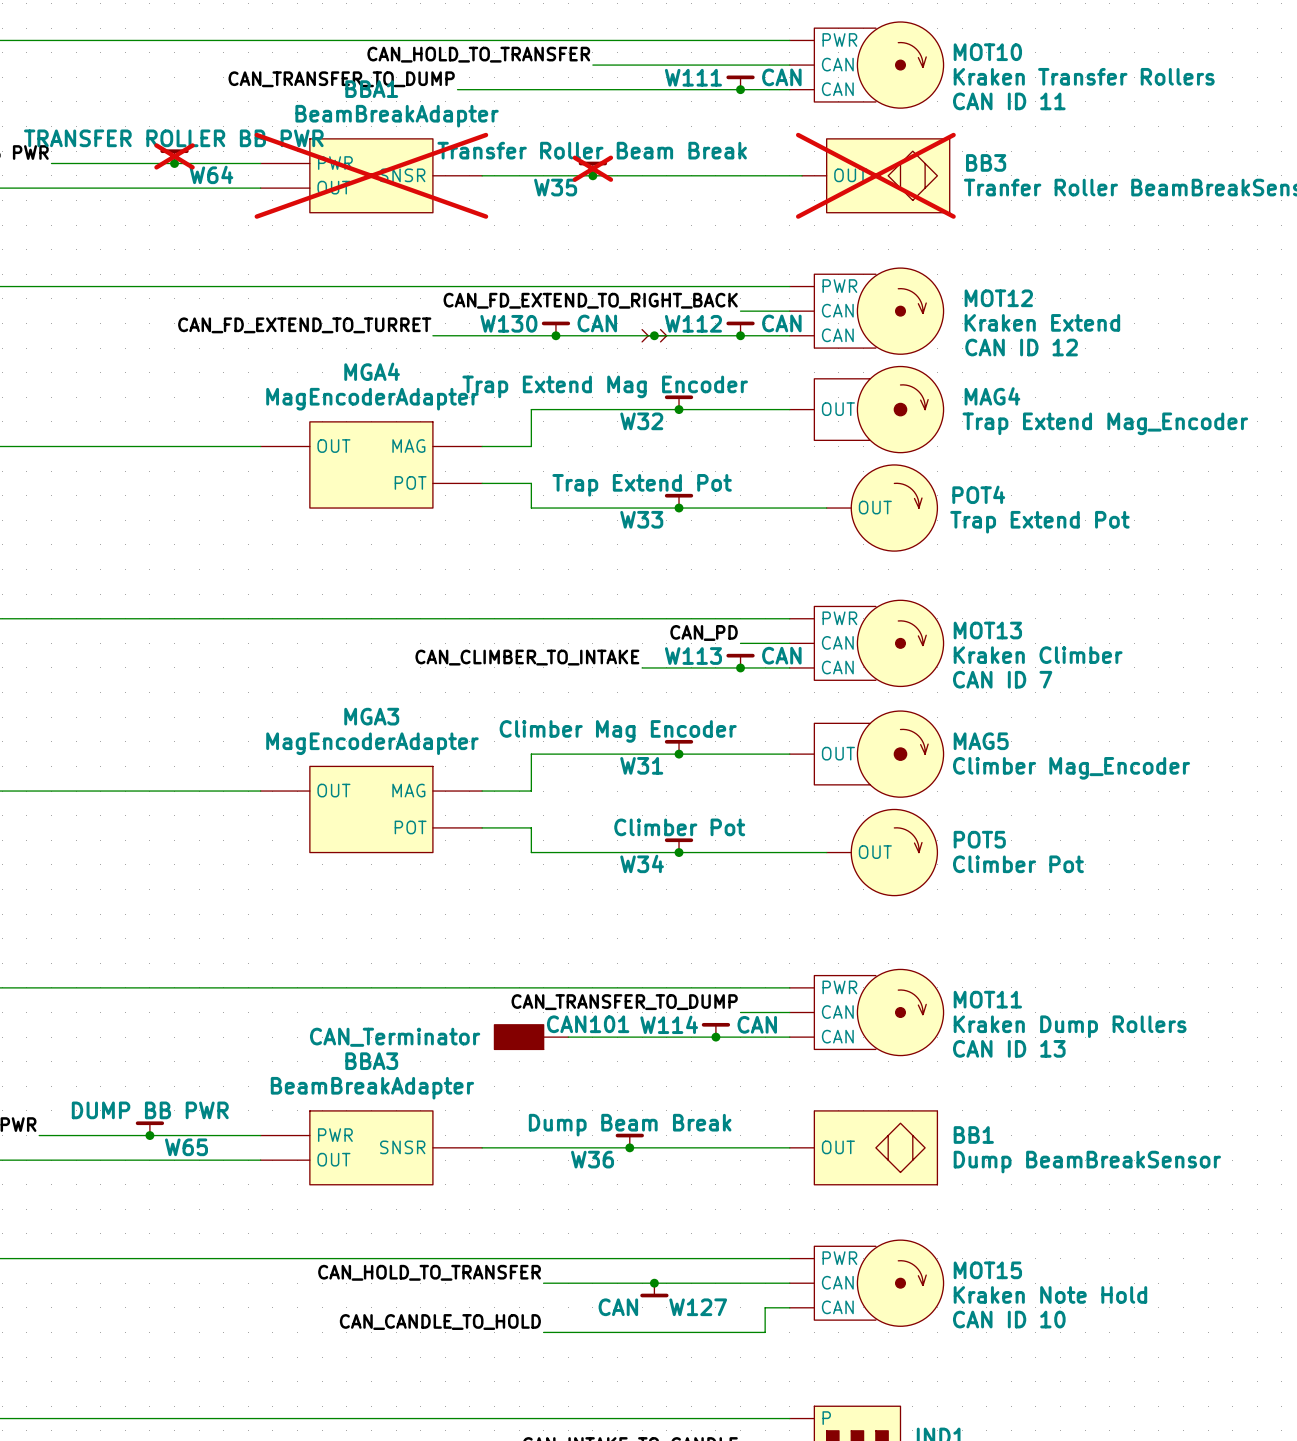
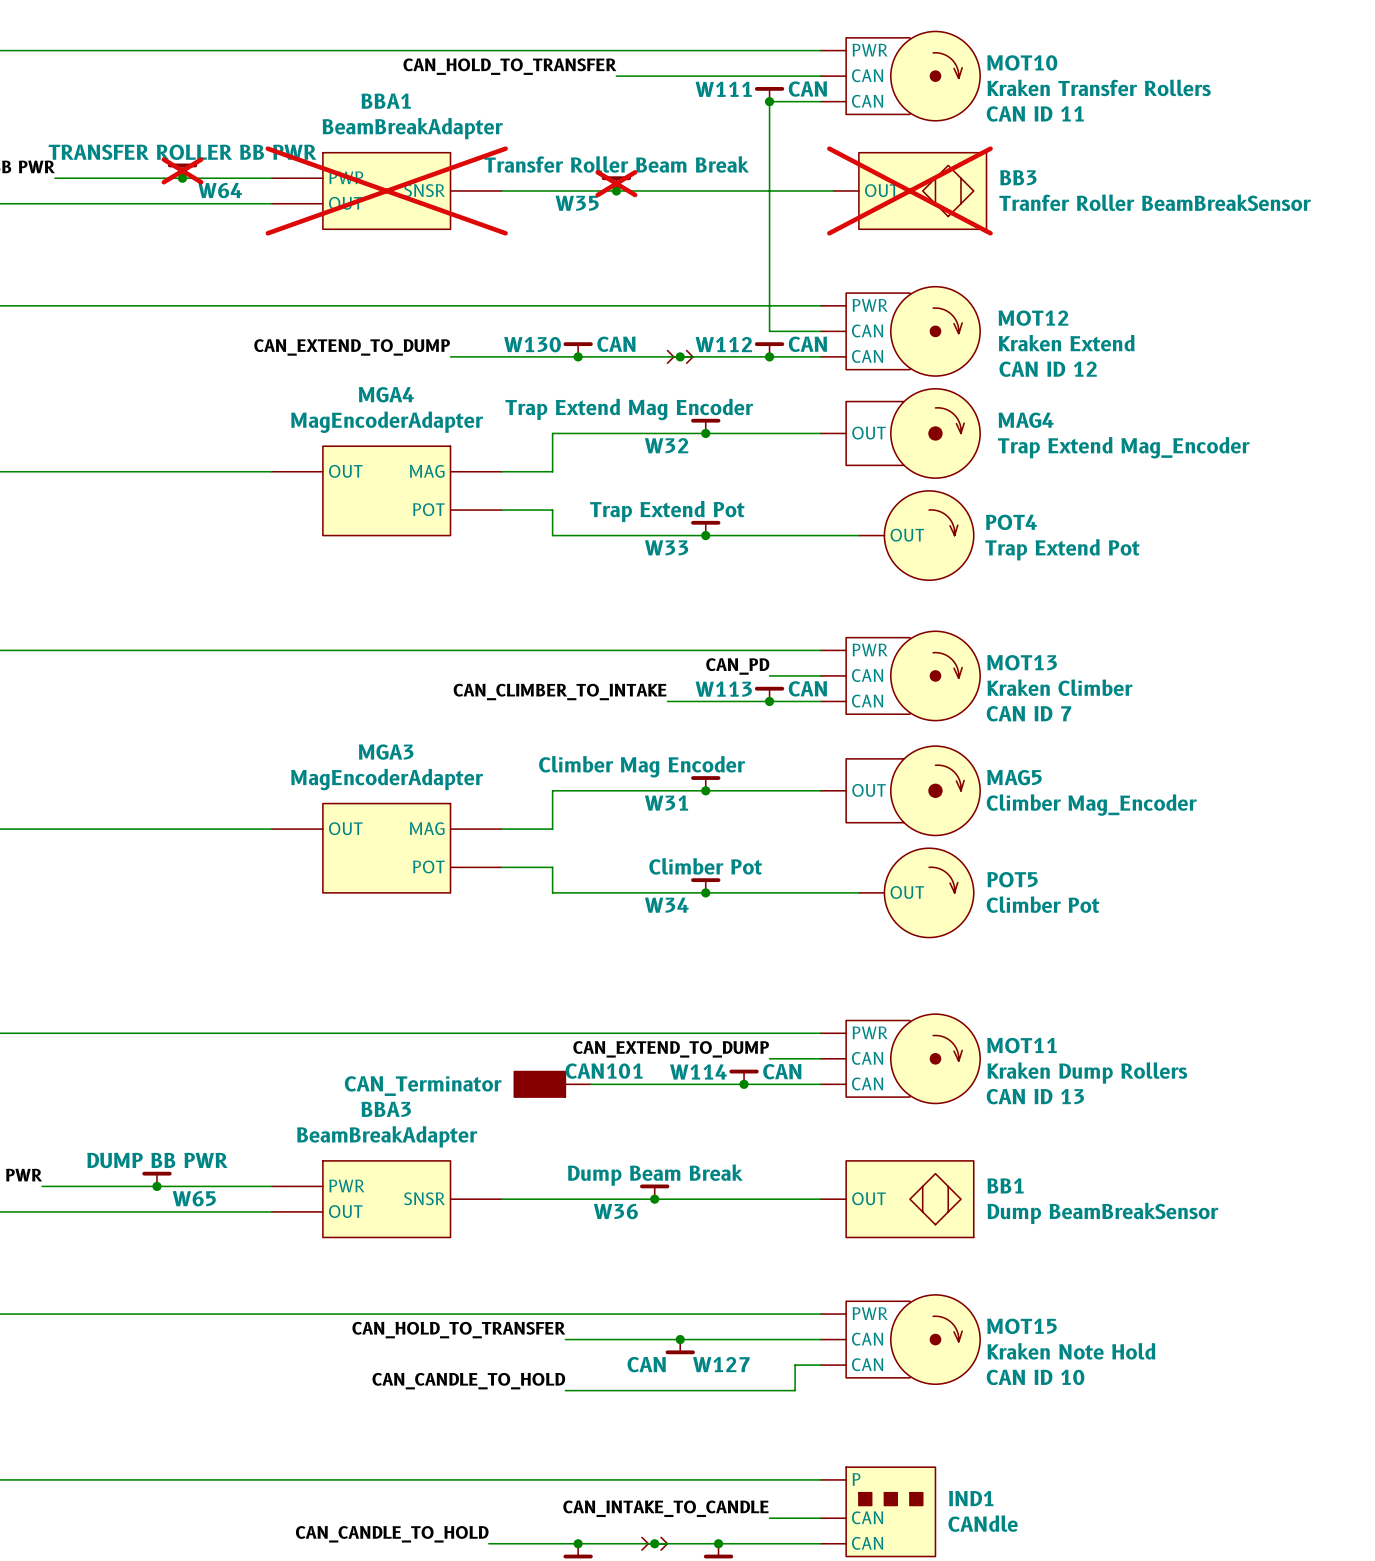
label: CAN_TRANSFER_TO_DUMP (341, 79) -> none
wire: (457, 89) (740, 89) -> (769, 331) (769, 101)
label: CAN_FD_EXTEND_TO_RIGHT_BACK (590, 300) -> none
label: CAN_FD_EXTEND_TO_TURRET (304, 325) -> CAN_EXTEND_TO_DUMP (352, 347)
label: CAN_TRANSFER_TO_DUMP (624, 1002) -> CAN_EXTEND_TO_DUMP (671, 1049)

